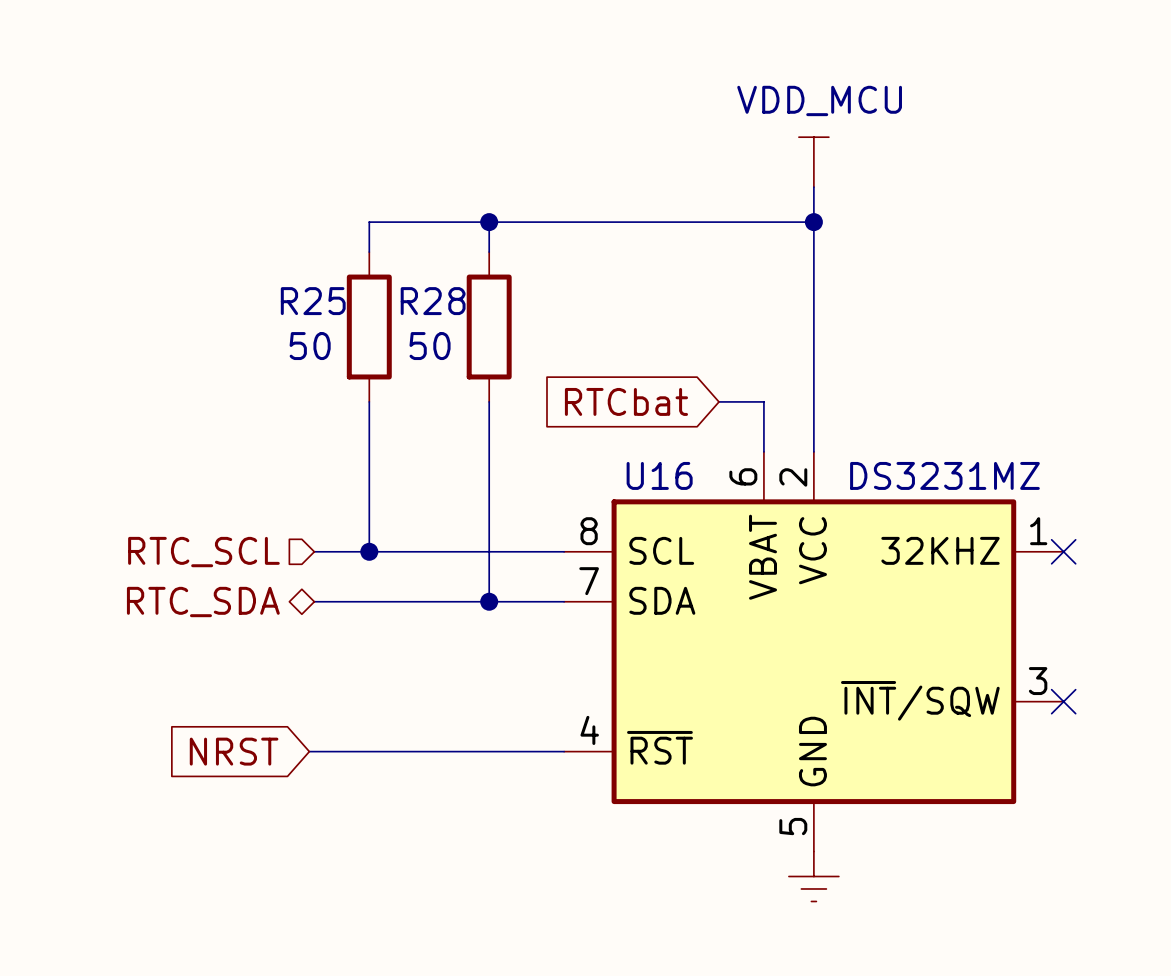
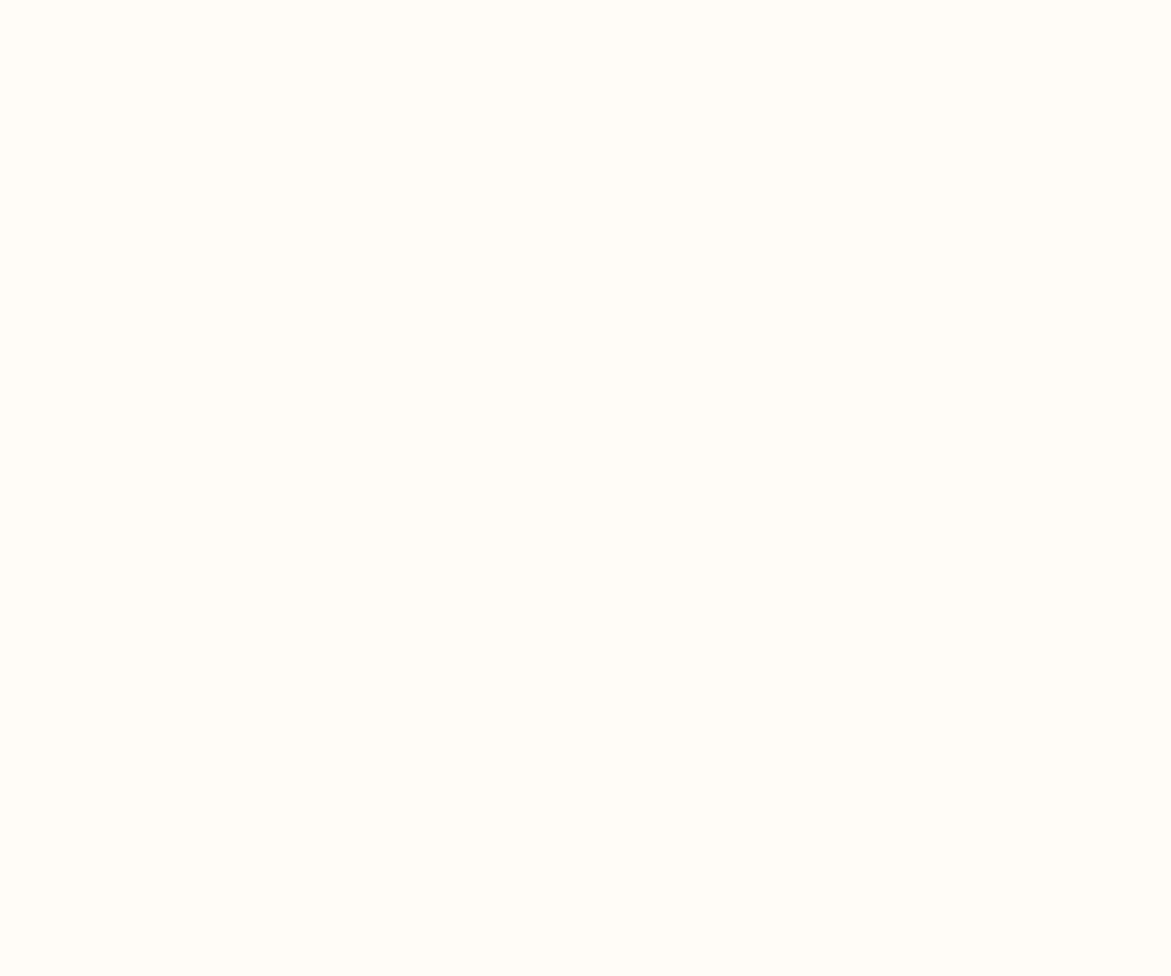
power symbol: VDD_MCU (813, 162) -> none
wire: (813, 187) (813, 451) -> none
wire: (489, 222) (489, 252) -> none
junction: (489, 222) -> none
wire: (813, 222) (369, 222) (369, 252) -> none
junction: (813, 222) -> none
R25: 50 (369, 327) -> none
R28: 50 (489, 327) -> none
wire: (369, 401) (369, 551) -> none
wire: (489, 401) (489, 601) -> none
global label: RTCbat (626, 401) -> none
wire: (718, 401) (763, 401) (763, 451) -> none
wire: (314, 551) (564, 551) -> none
junction: (369, 551) -> none
no-connect mark: (1063, 551) -> none
hierarchical label: RTC_SCL (203, 552) -> none
wire: (314, 601) (564, 601) -> none
junction: (489, 601) -> none
hierarchical label: RTC_SDA (203, 602) -> none
U16: DS3231MZ (813, 651) -> none
no-connect mark: (1063, 701) -> none
global label: NRST (234, 751) -> none
wire: (309, 751) (564, 751) -> none
power symbol: (813, 876) -> none

